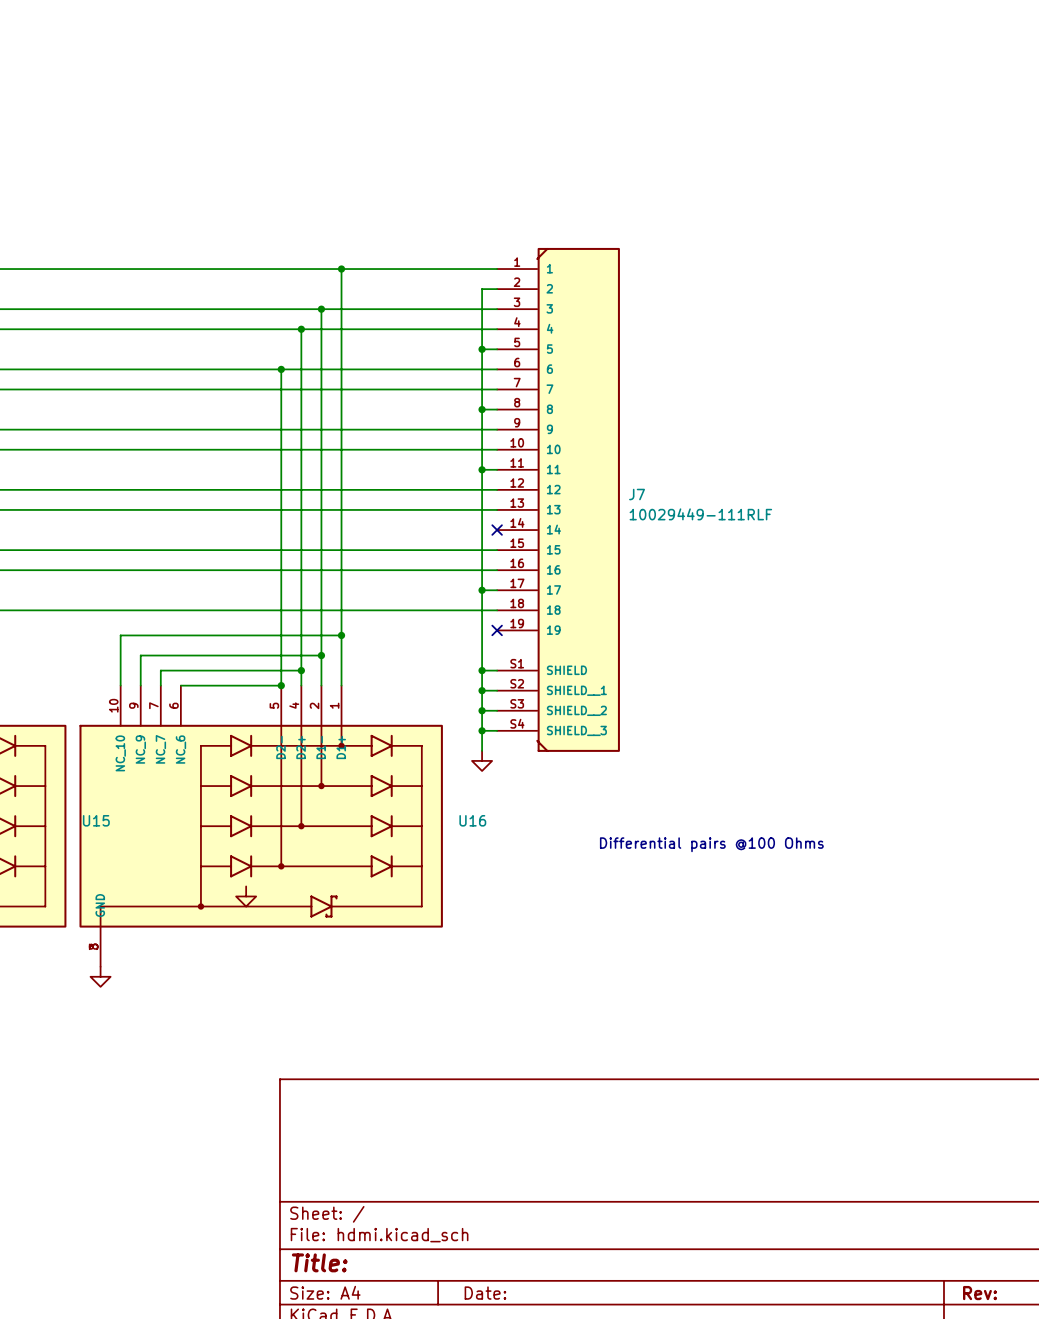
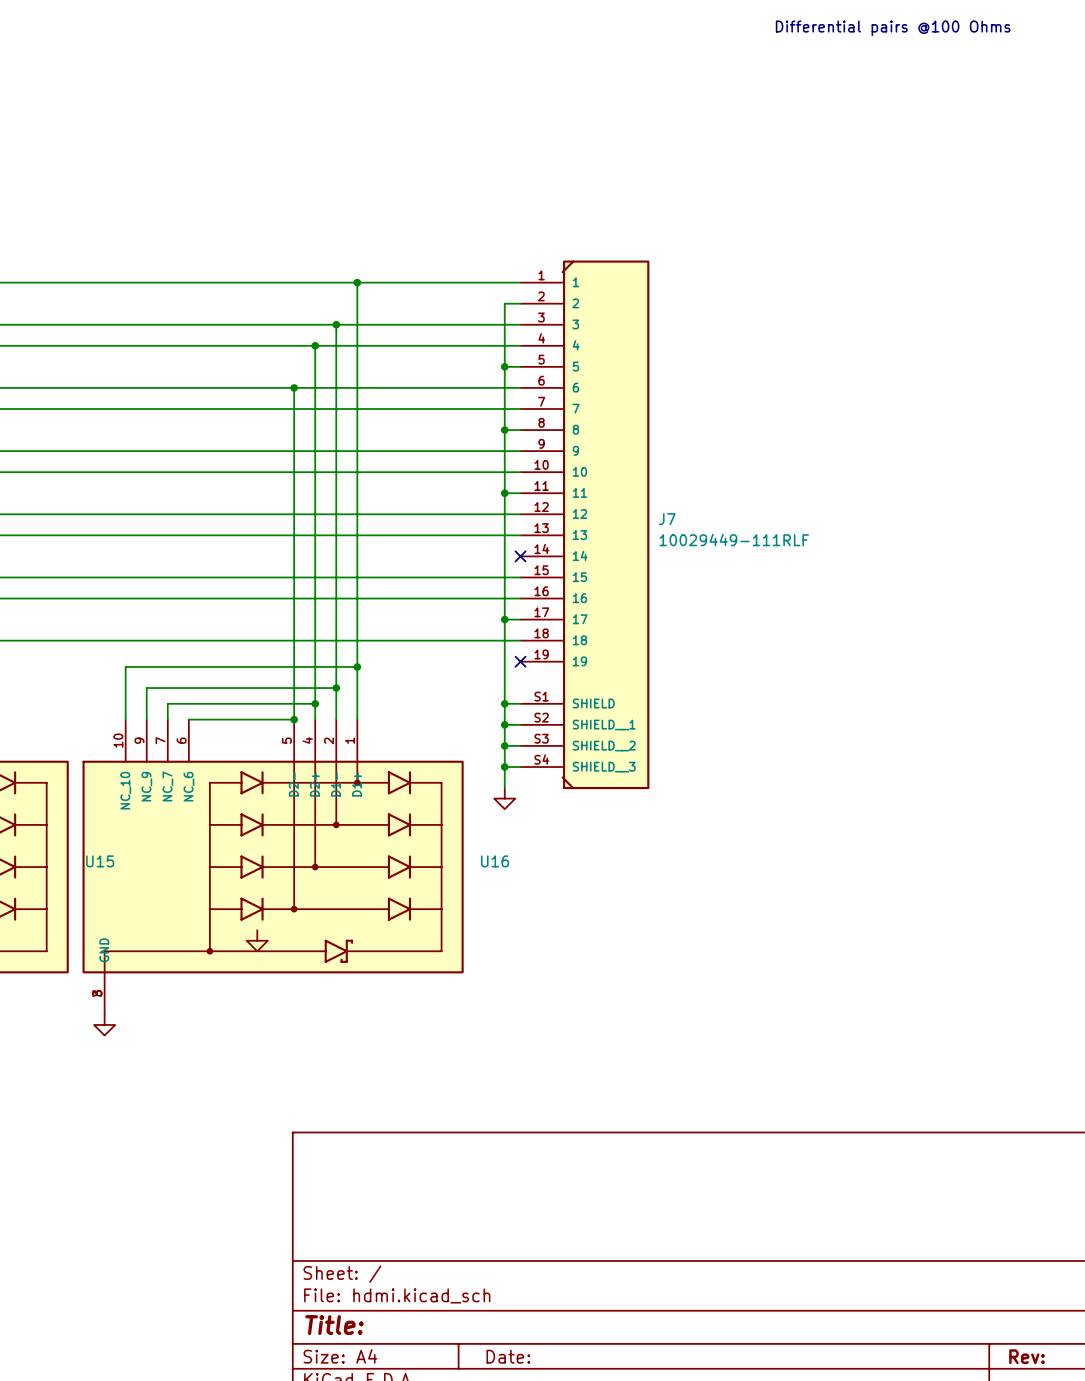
text: none -> Differential pairs @100 Ohms (893, 28)
text: Differential pairs @100 Ohms (711, 844) -> none

